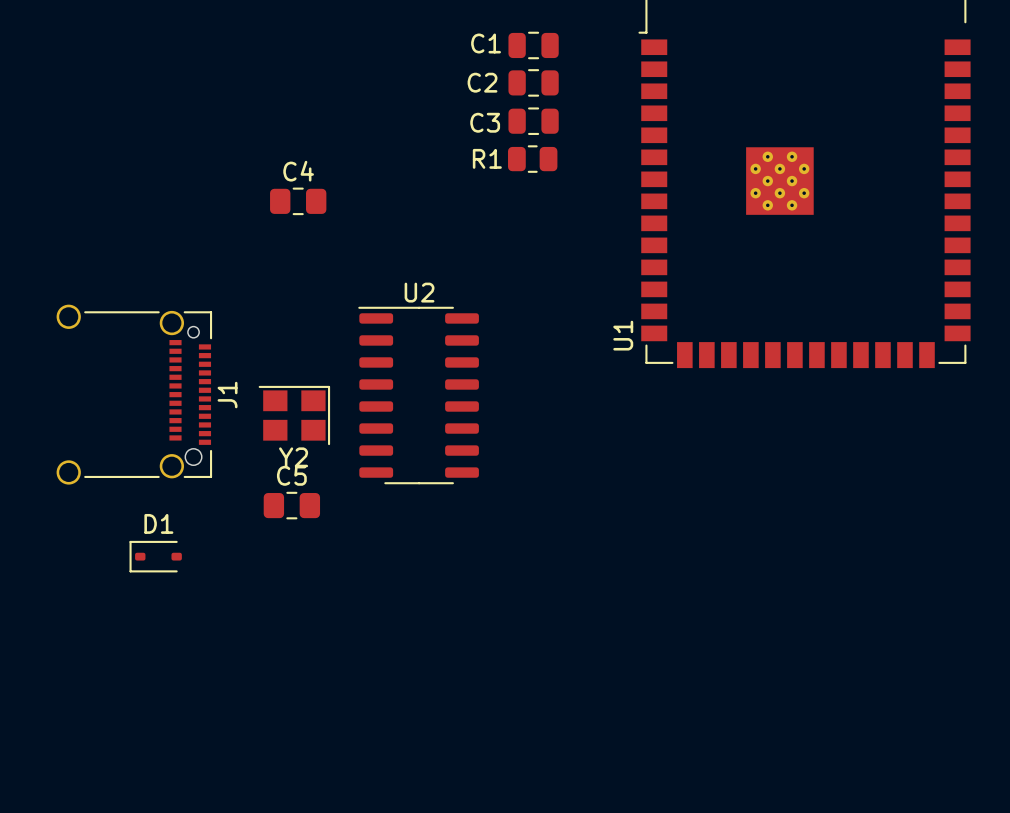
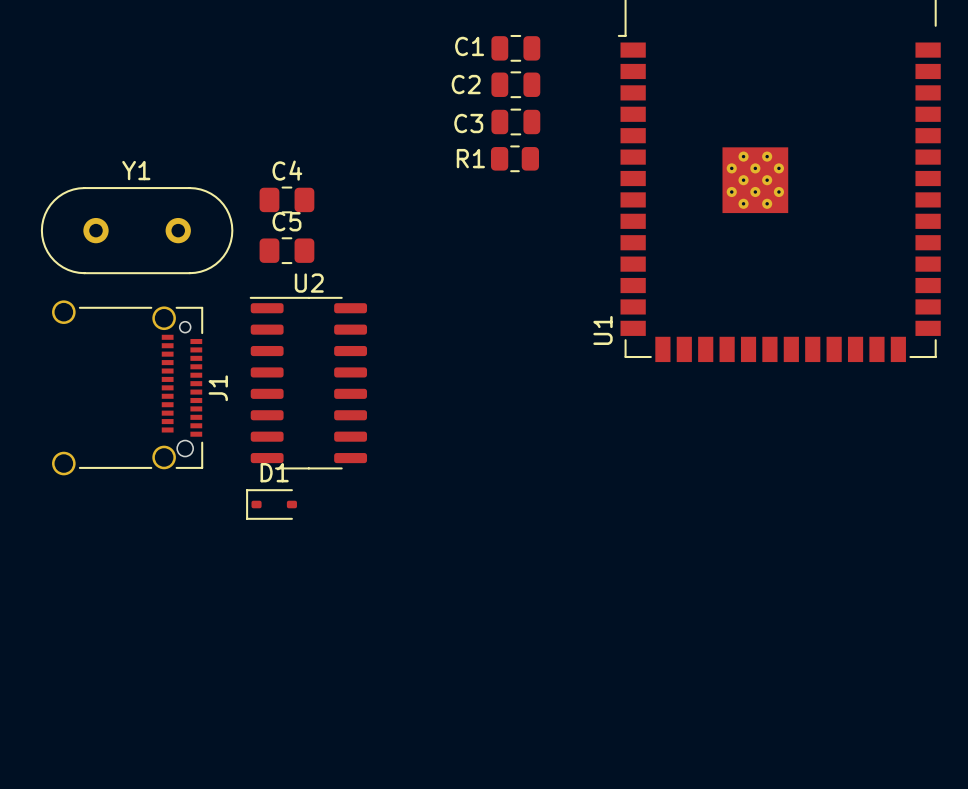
Y1: none -> (137, 230)
U2 position: (418, 395) -> (308, 383)
Y2: (294, 415) -> none
C5 position: (291, 505) -> (286, 250)
D1 position: (155, 556) -> (271, 504)

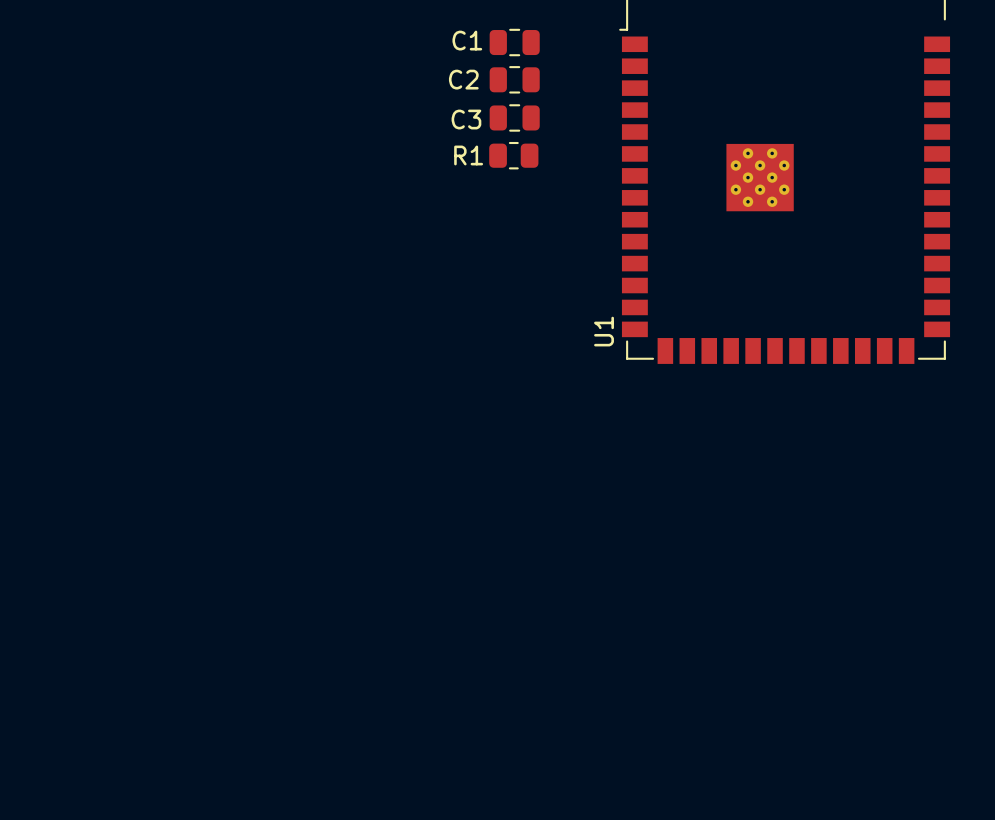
C4: (286, 199) -> none
Y1: (137, 230) -> none
C5: (286, 250) -> none
U2: (308, 383) -> none
J1: (127, 387) -> none
D1: (271, 504) -> none

